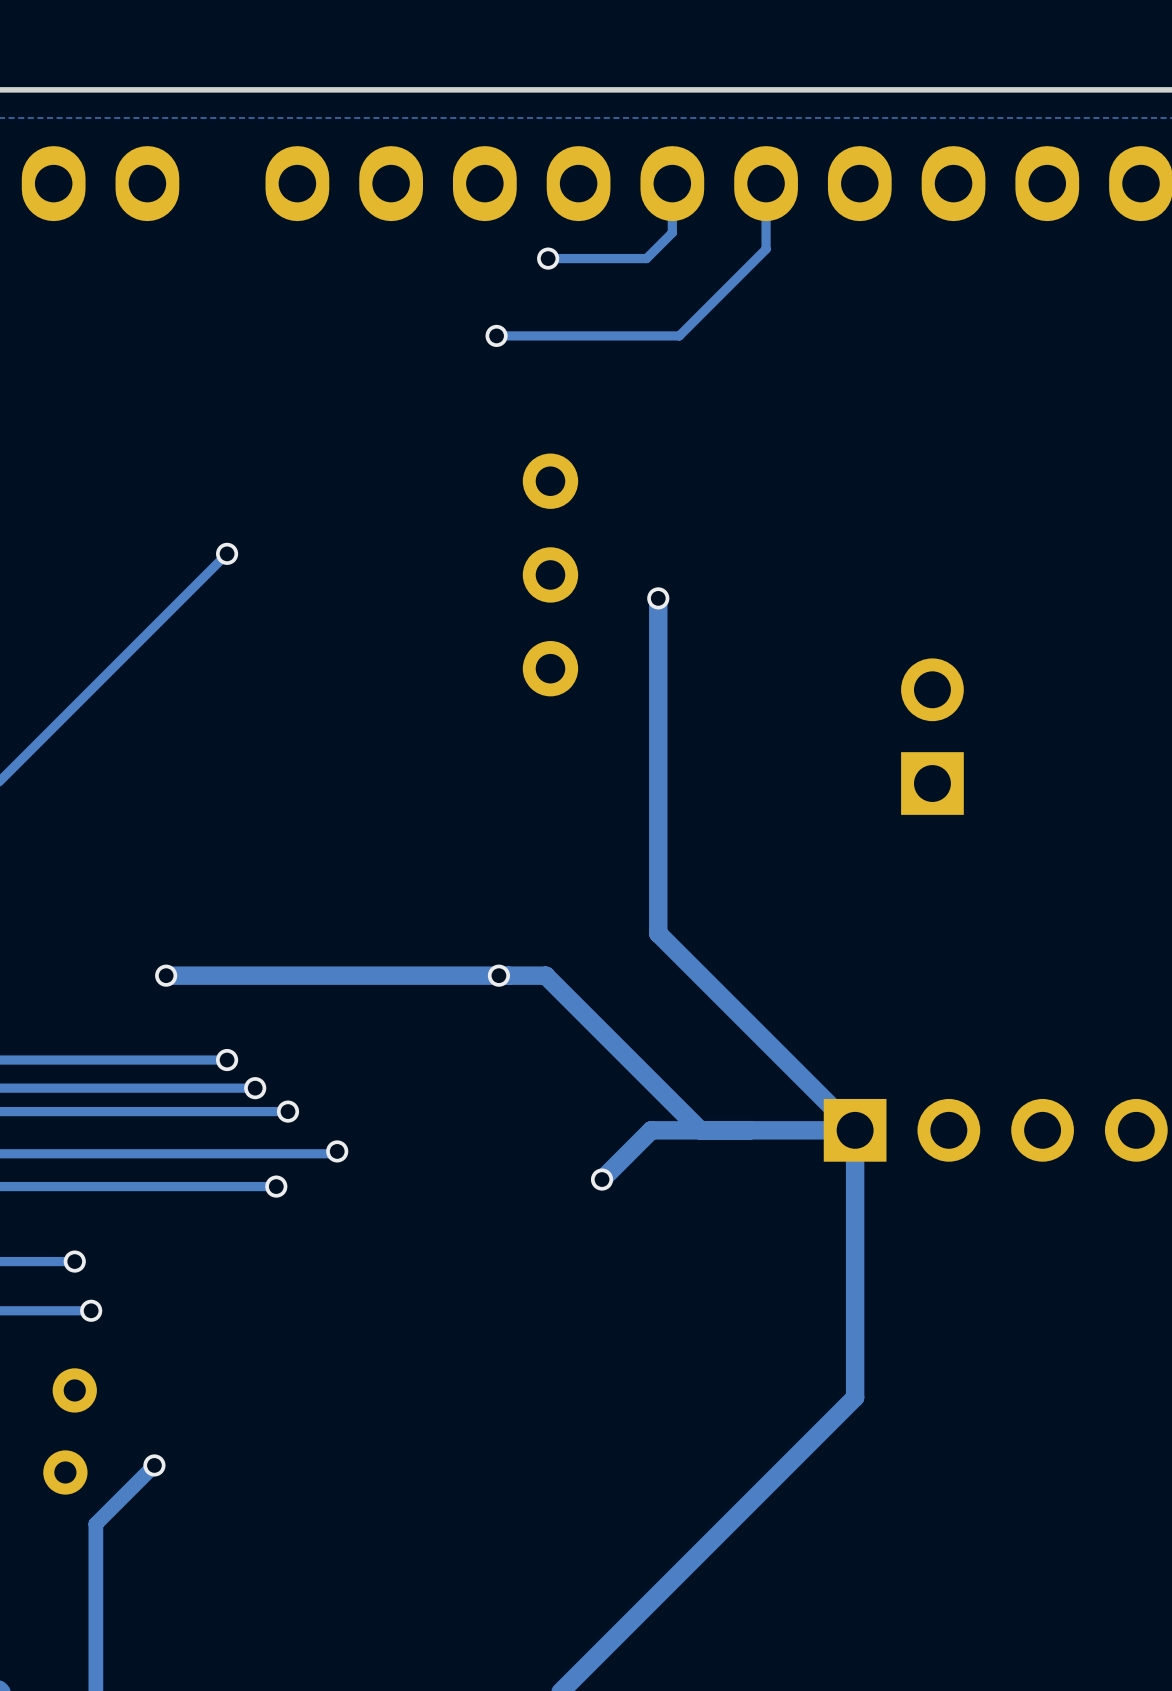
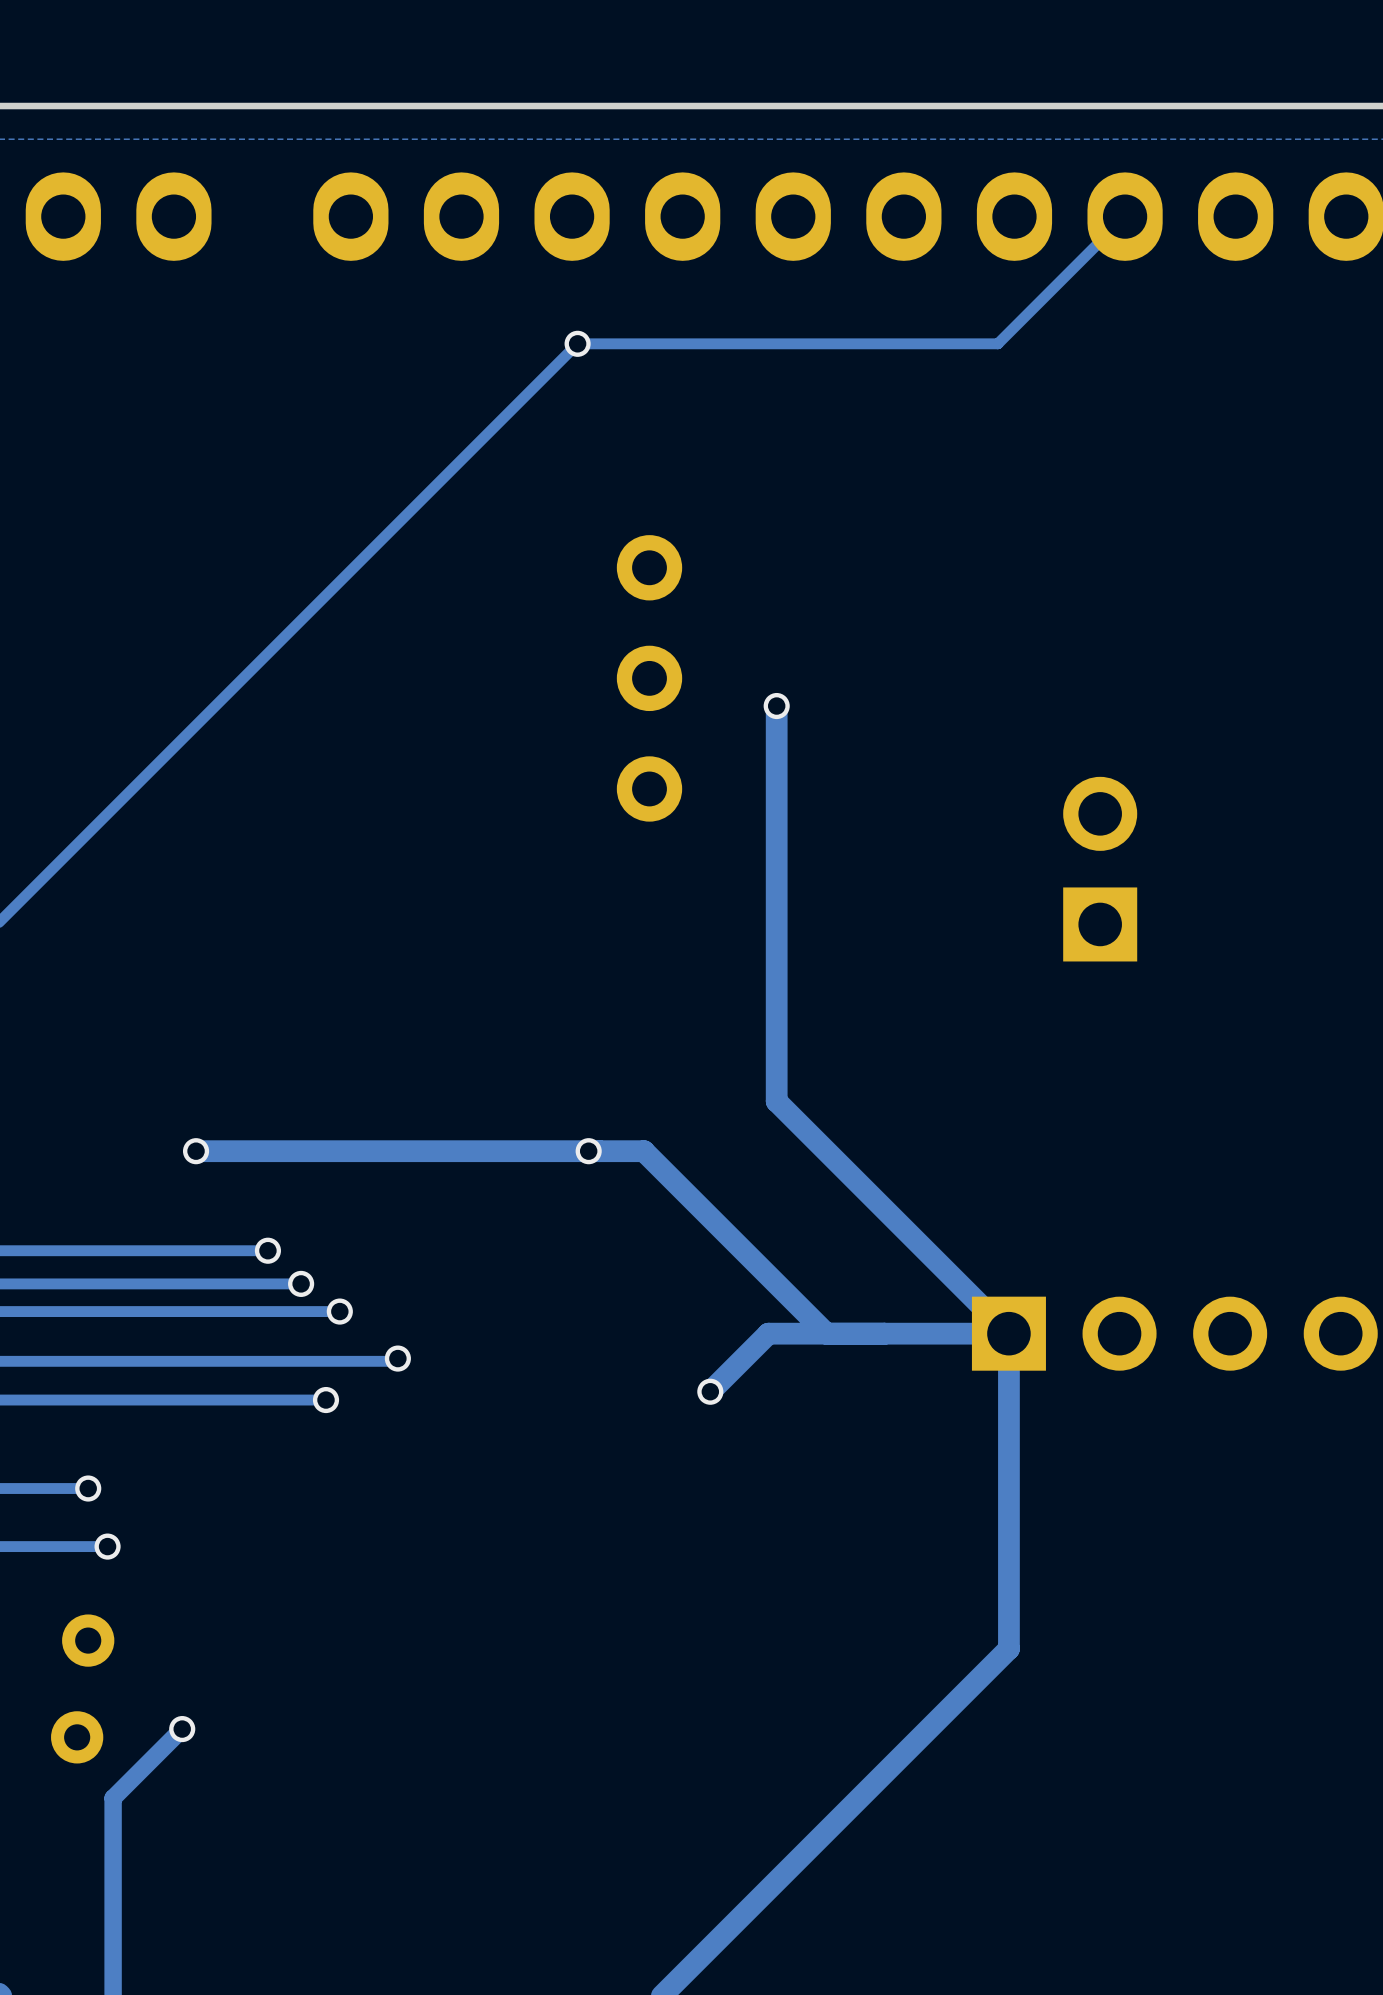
track: (672, 183) (672, 232) (646, 258) (548, 258) -> none
track: (766, 183) (766, 249) (679, 335) (496, 335) -> none
track: none -> (1125, 216) (997, 343) (577, 343) (267, 653)
via: (548, 258) -> none
via: none -> (577, 343)
via: (496, 335) -> none
via: (227, 553) -> none

